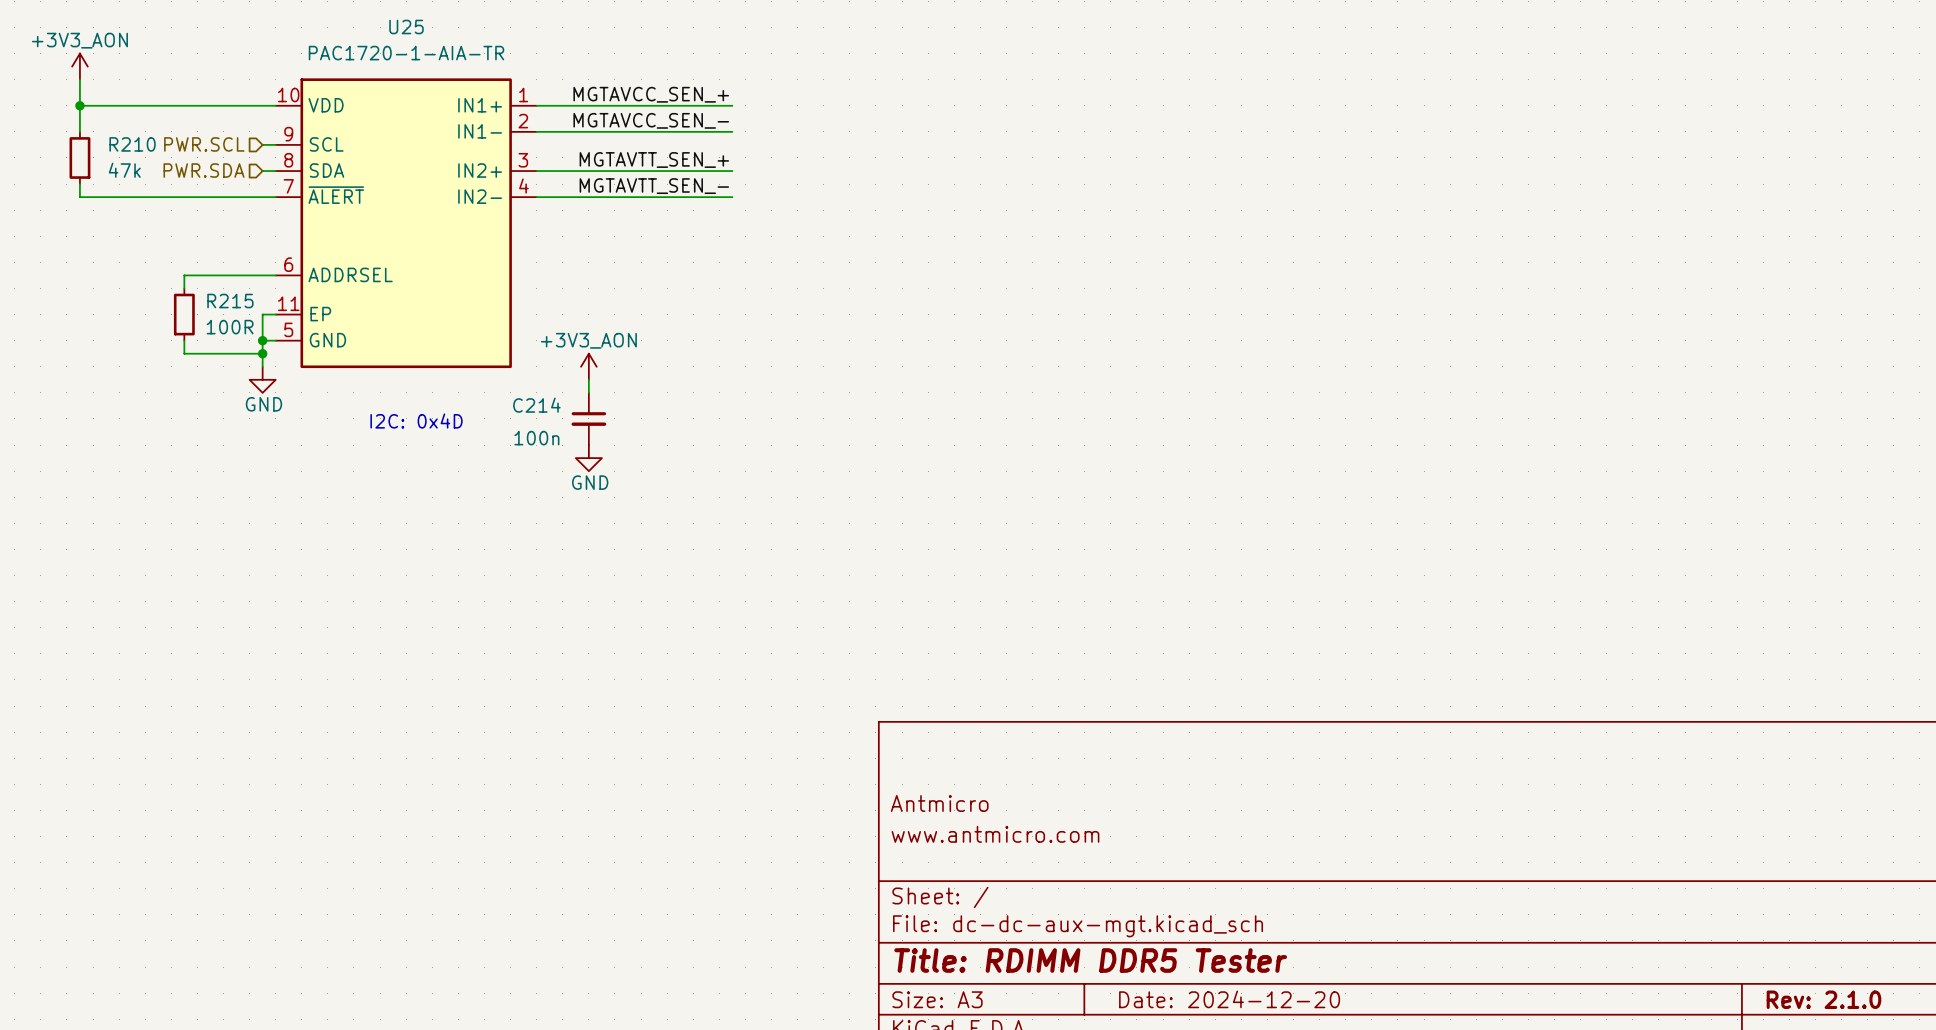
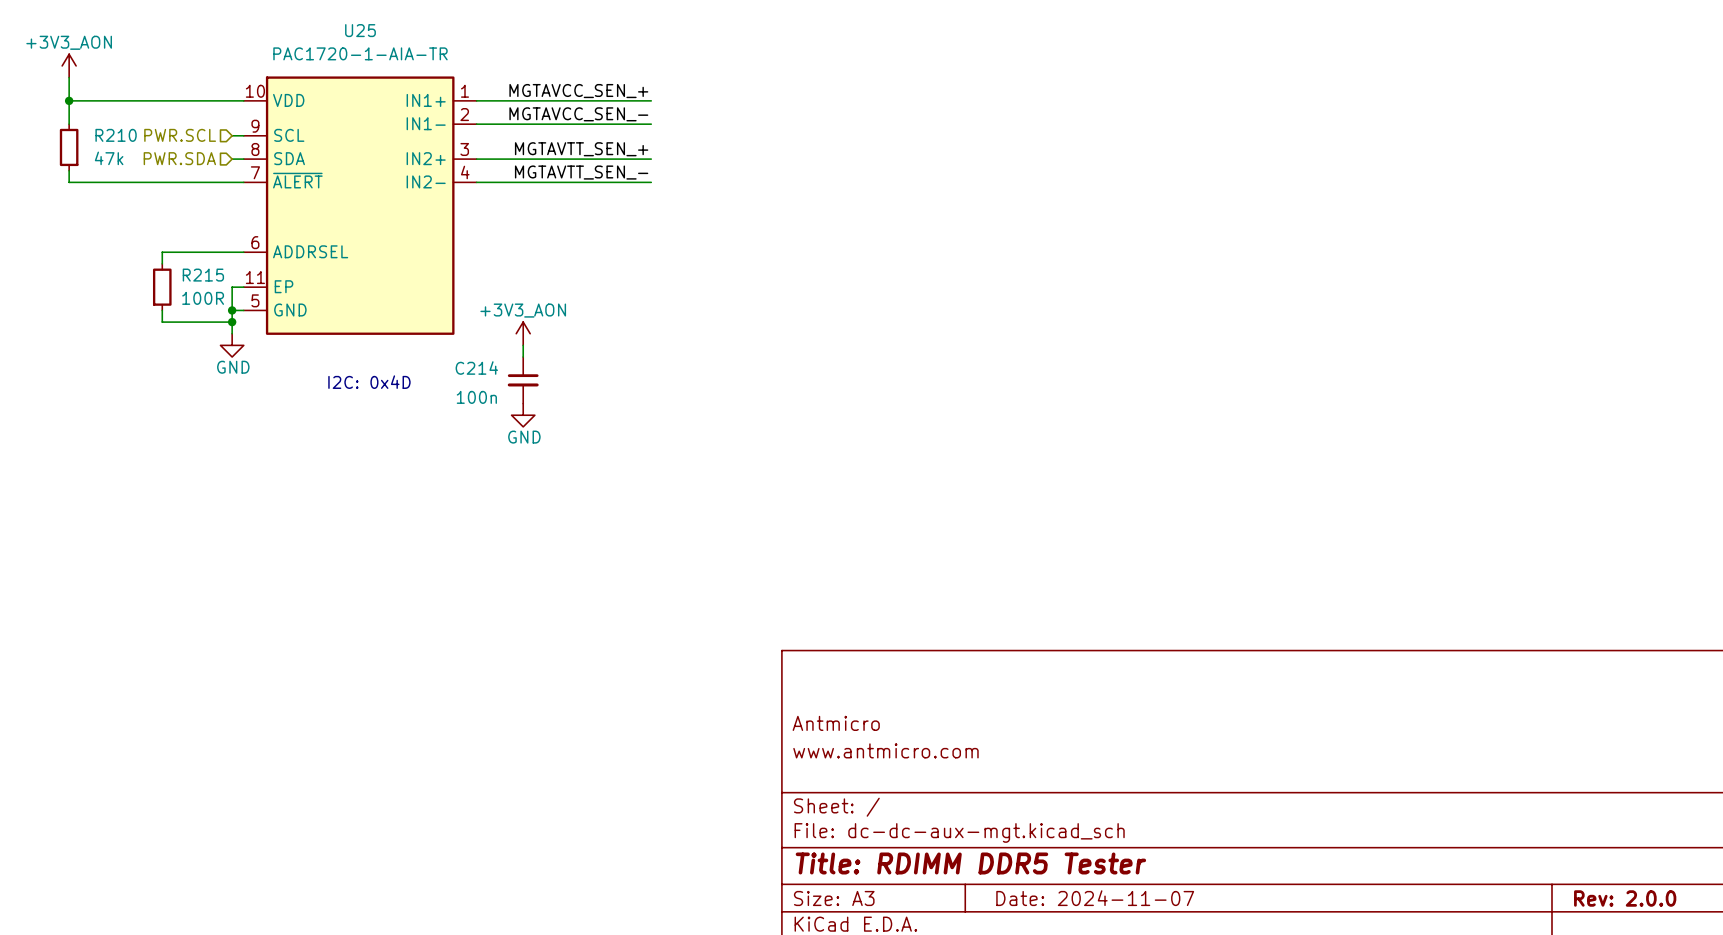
title block: Date: 2024-12-20 (1229, 999) -> Date: 2024-11-07 (1095, 898)
title block: Rev: 2.1.0 (1823, 999) -> Rev: 2.0.0 (1625, 898)

